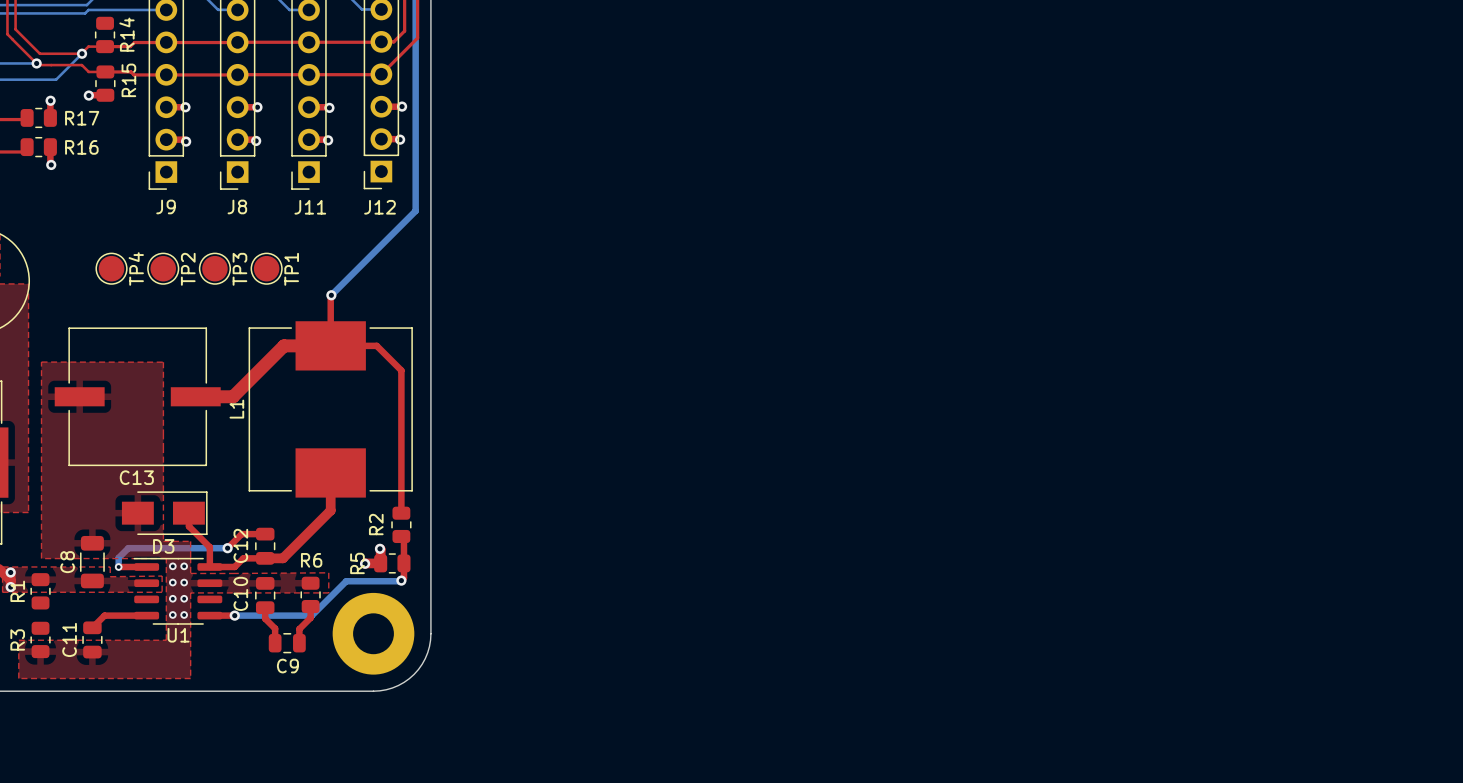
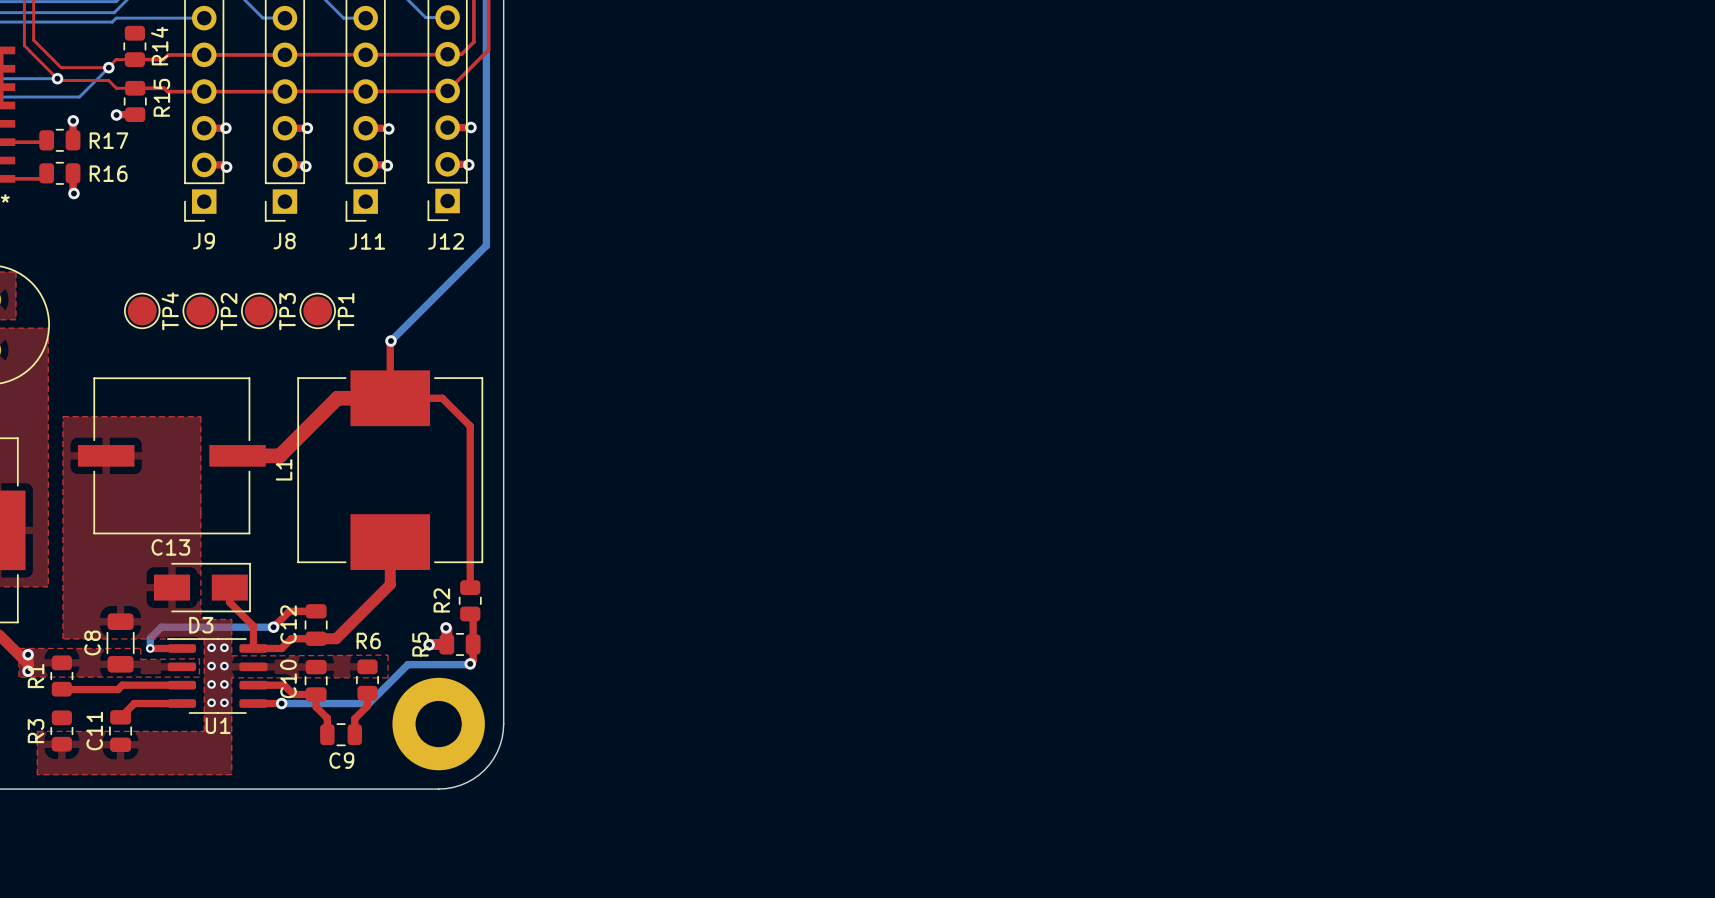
top track: none -> (181, 685) (122, 685) (118, 689) (61, 689)
top track: none -> (253, 685) (284, 685) (293, 694) (316, 694)

